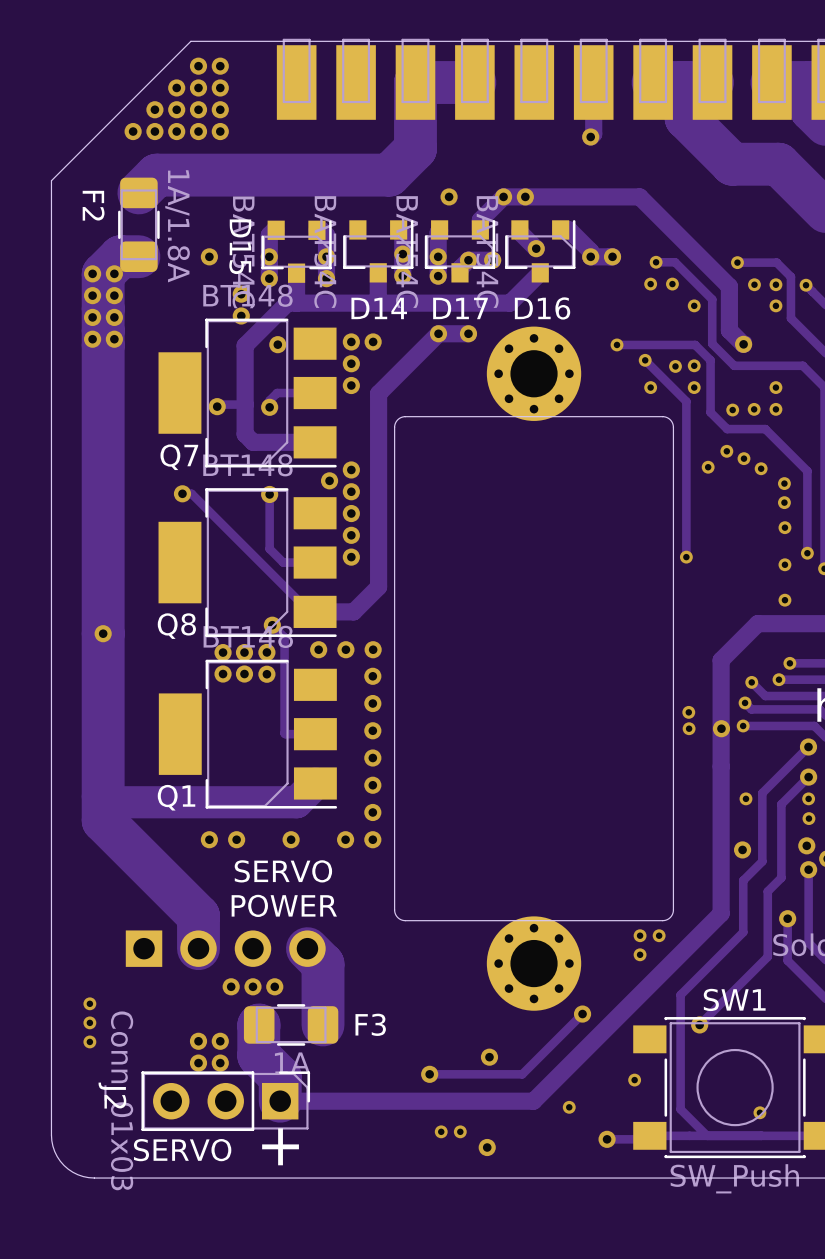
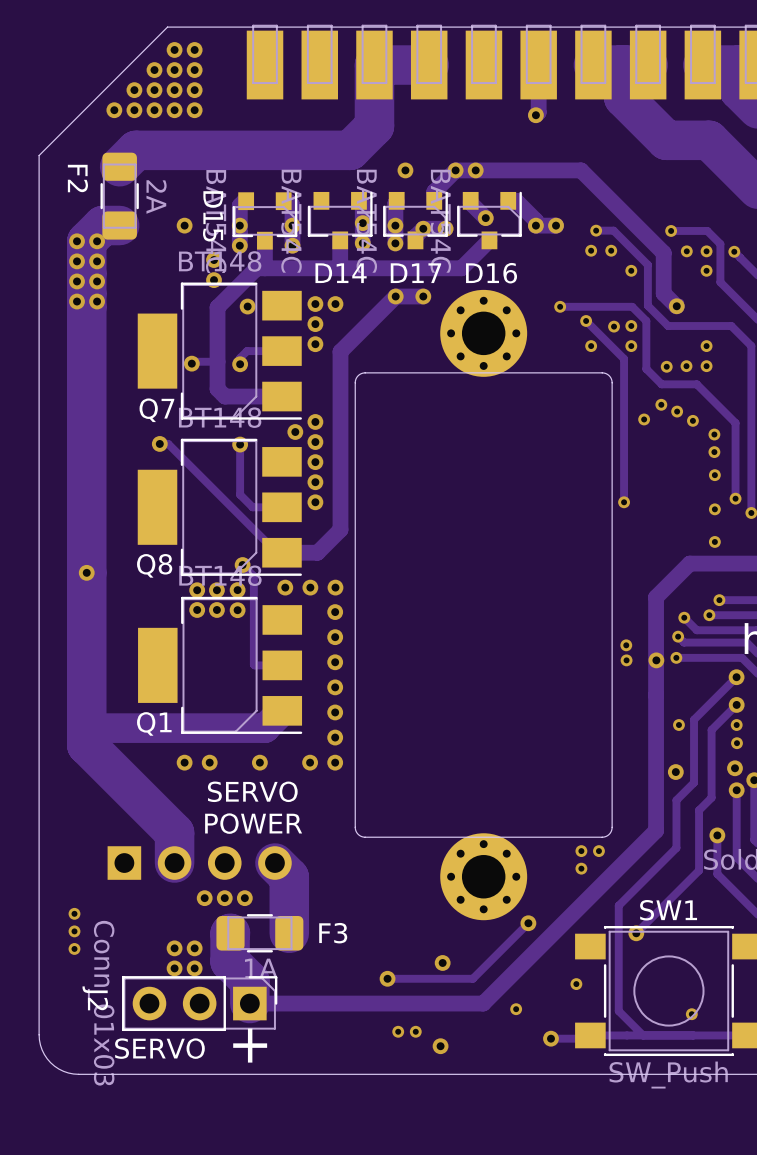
F2 value: 1A/1.8A (177, 226) -> 2A (156, 197)

